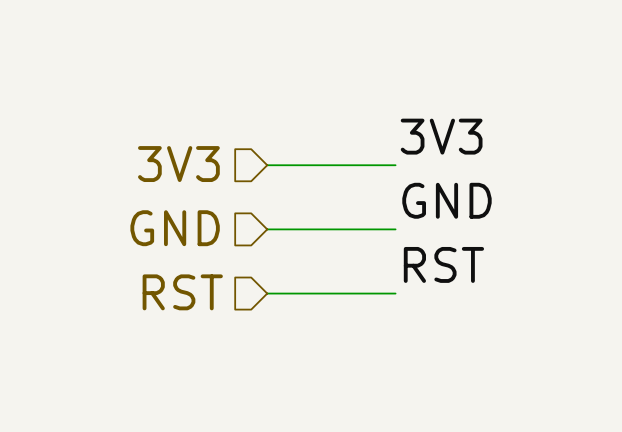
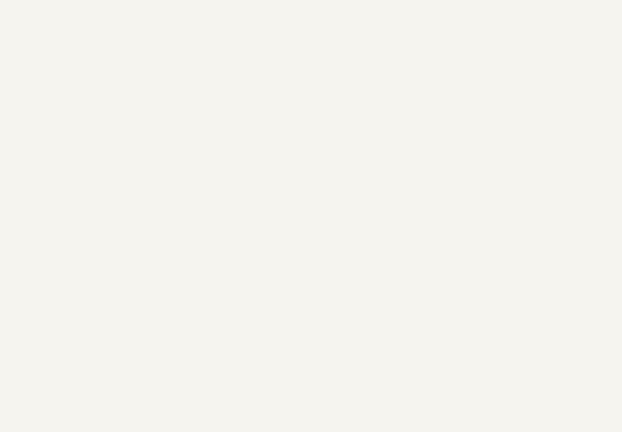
label: 3V3 (441, 136) -> none
hierarchical label: 3V3 (178, 164) -> none
wire: (267, 165) (395, 165) -> none
label: GND (446, 200) -> none
hierarchical label: GND (175, 228) -> none
wire: (267, 229) (395, 229) -> none
label: RST (443, 264) -> none
hierarchical label: RST (182, 292) -> none
wire: (267, 293) (395, 293) -> none

